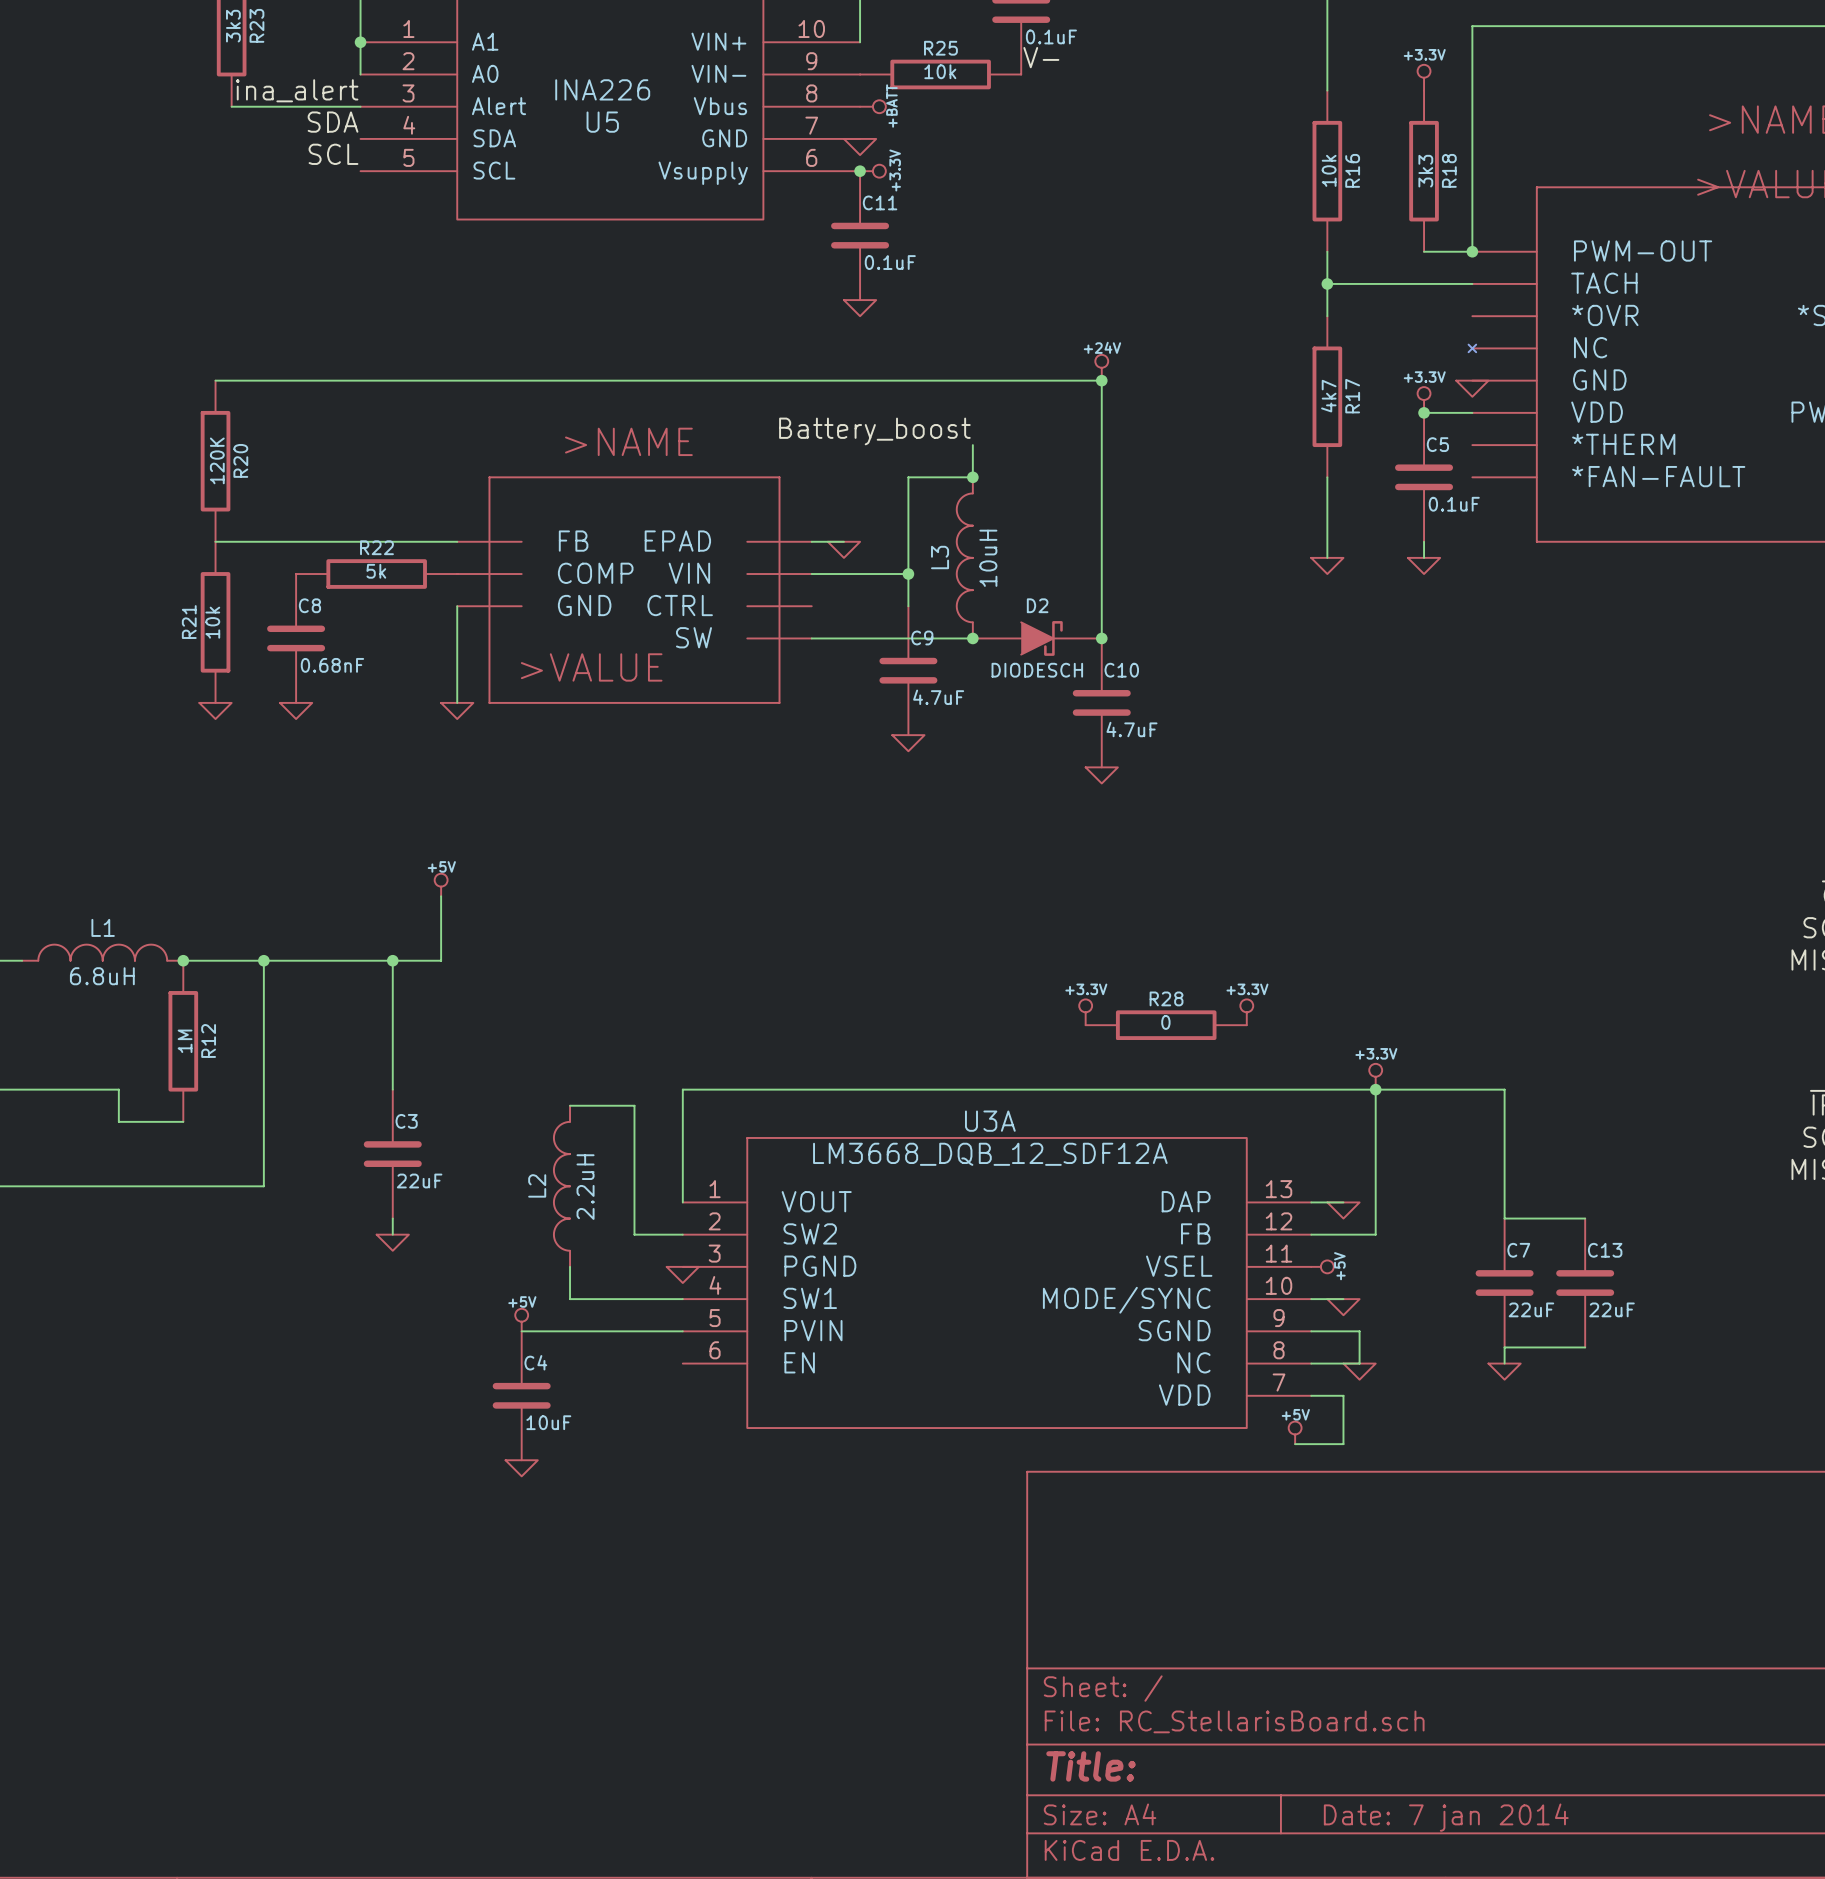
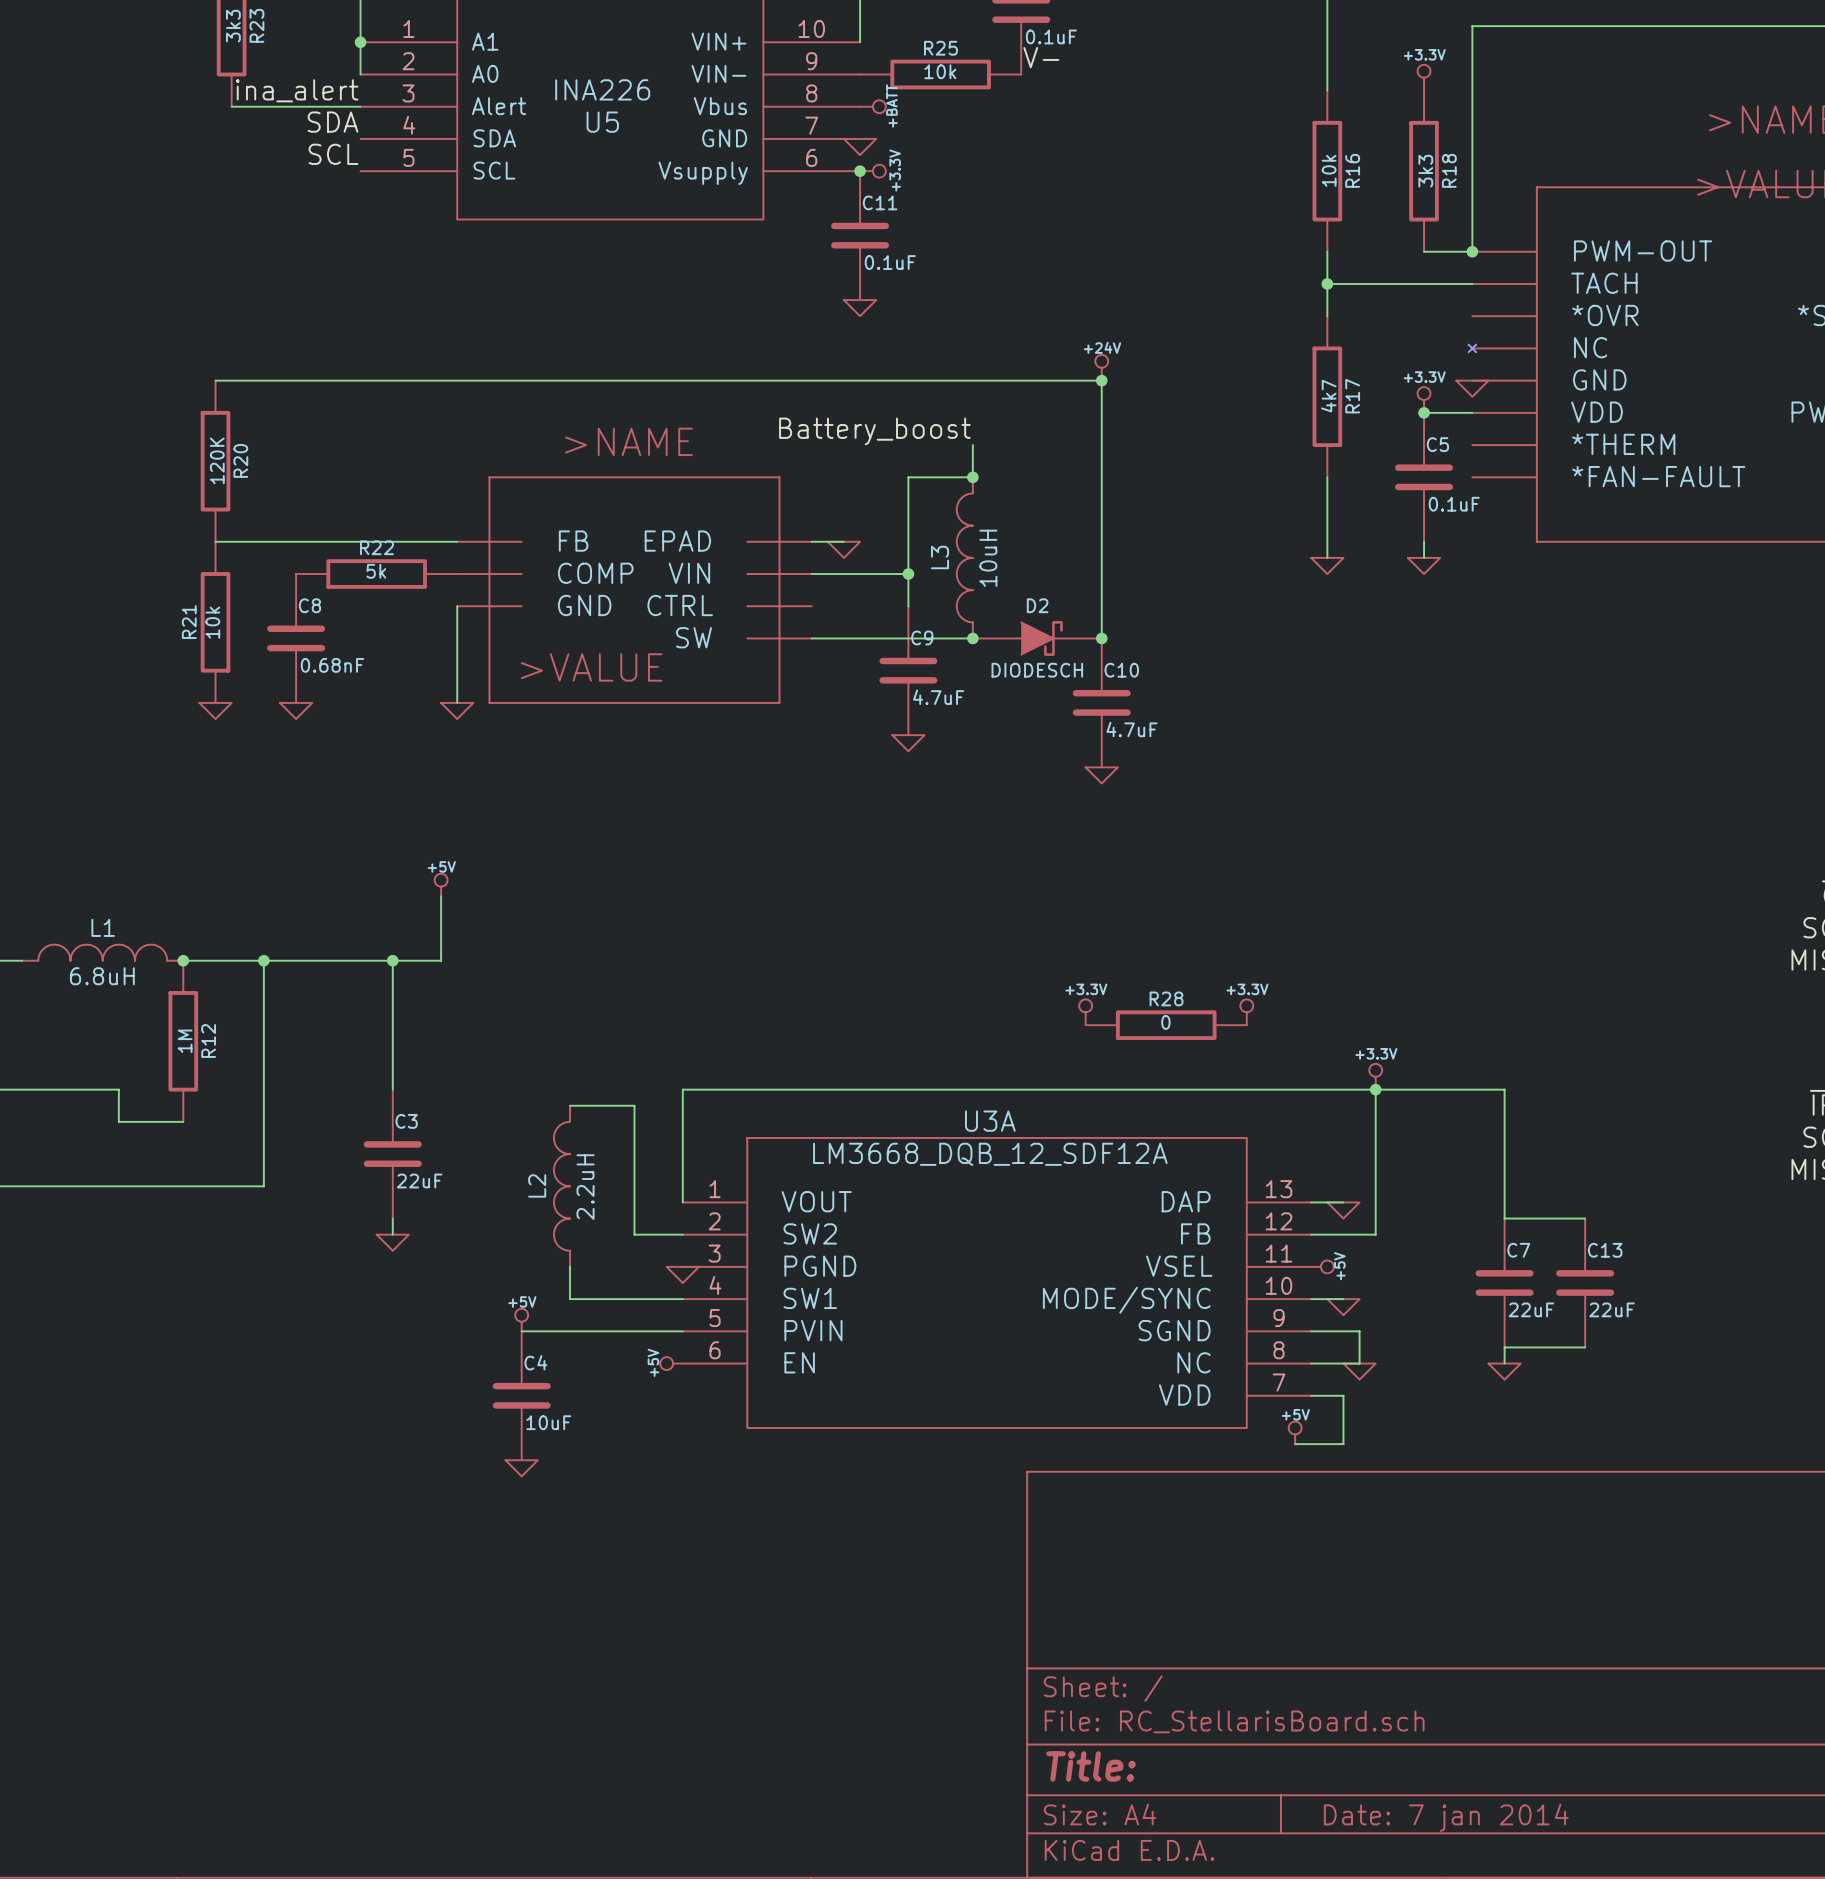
power symbol: none -> +5V (671, 1363)

